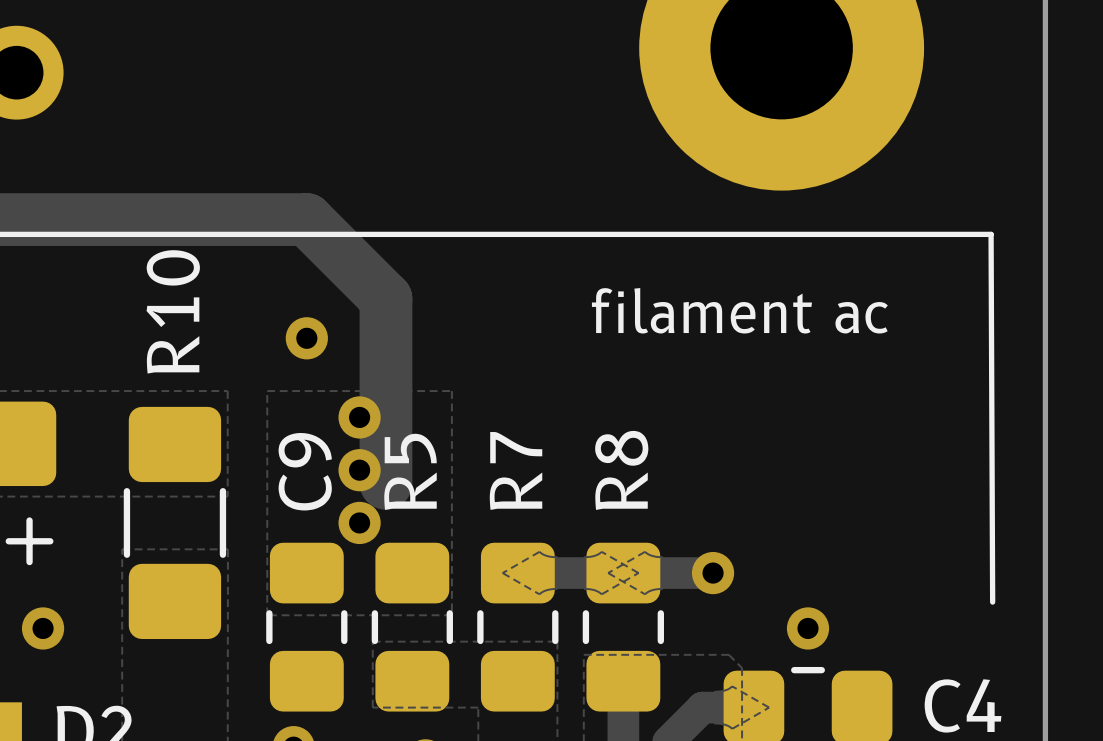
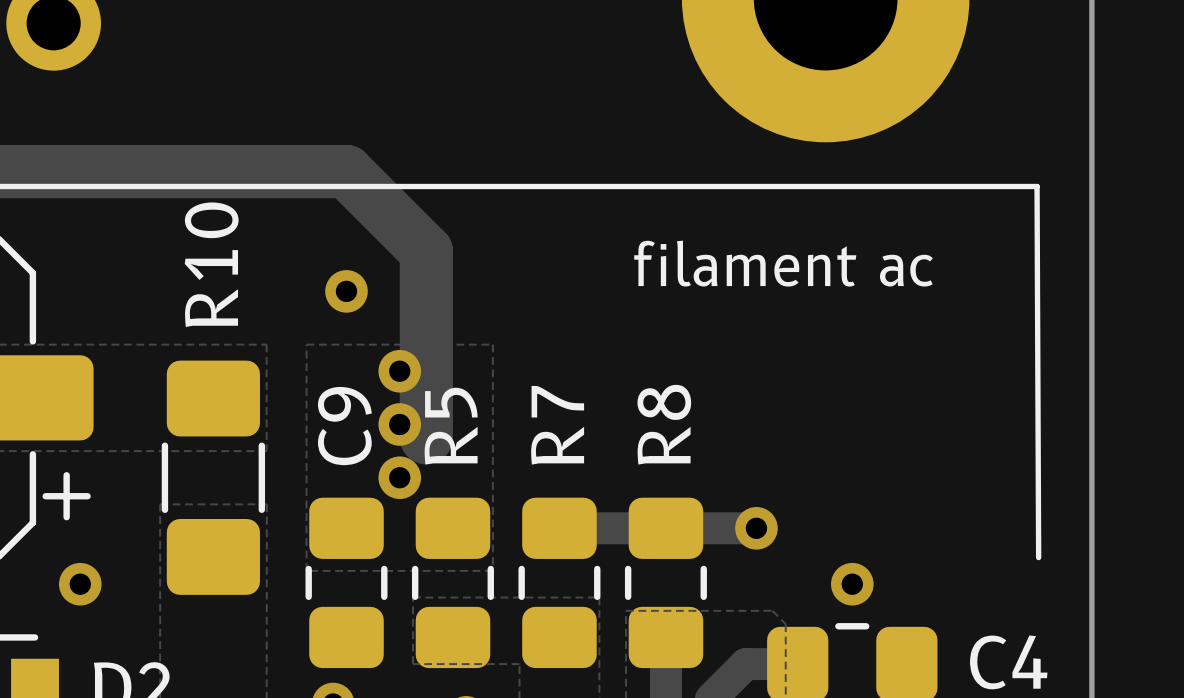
zone outline: (539, 551) (546, 555) (557, 557) (557, 588) (546, 590) (539, 594) (502, 573) (539, 551) -> none
zone outline: (601, 551) (638, 573) (601, 594) (594, 590) (583, 588) (583, 557) (594, 555) (601, 551) -> none
zone outline: (645, 551) (652, 555) (662, 557) (662, 588) (652, 590) (645, 594) (608, 573) (645, 551) -> none
zone outline: (732, 686) (769, 707) (732, 728) (725, 724) (714, 723) (714, 691) (725, 690) (732, 686) -> none

